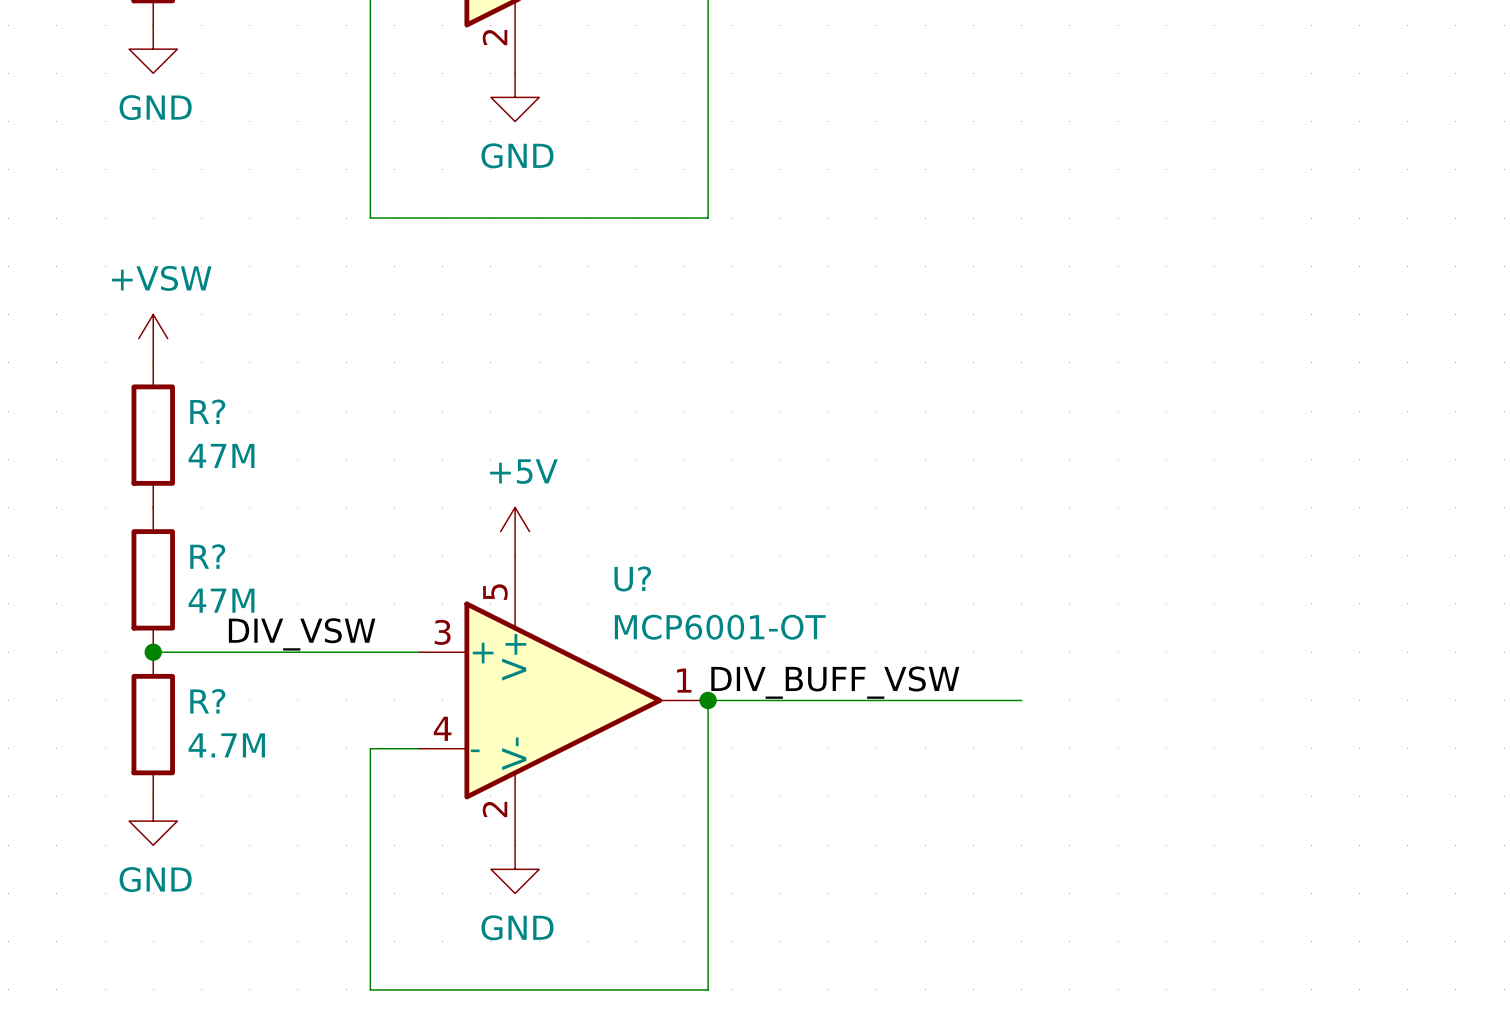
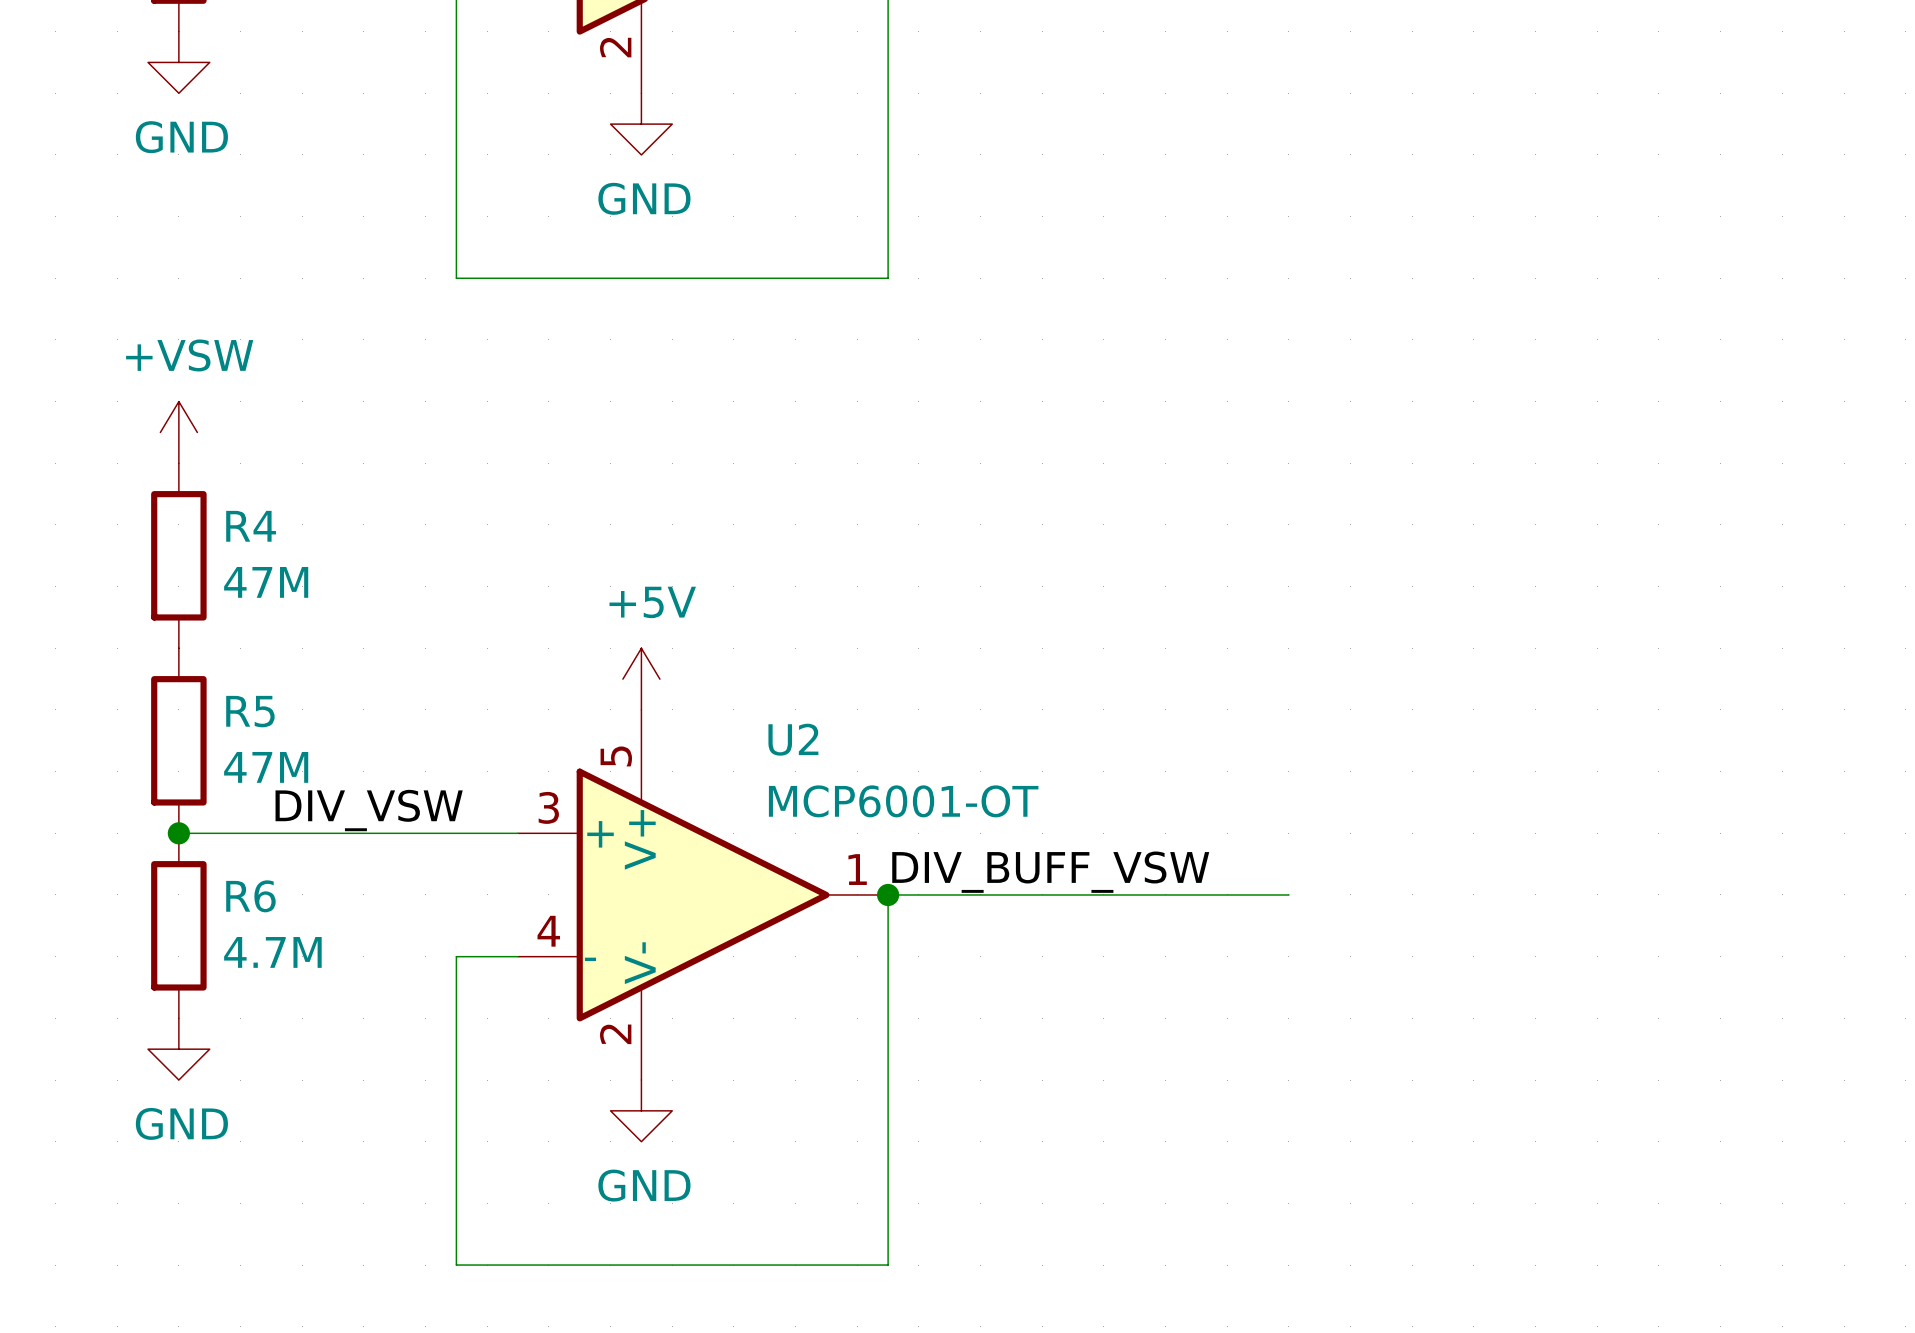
R? name: R? (207, 411) -> R4 (251, 526)
R? name: R? (207, 556) -> R5 (250, 711)
U? name: U? (632, 578) -> U2 (793, 739)
R? name: R? (207, 701) -> R6 (250, 896)

